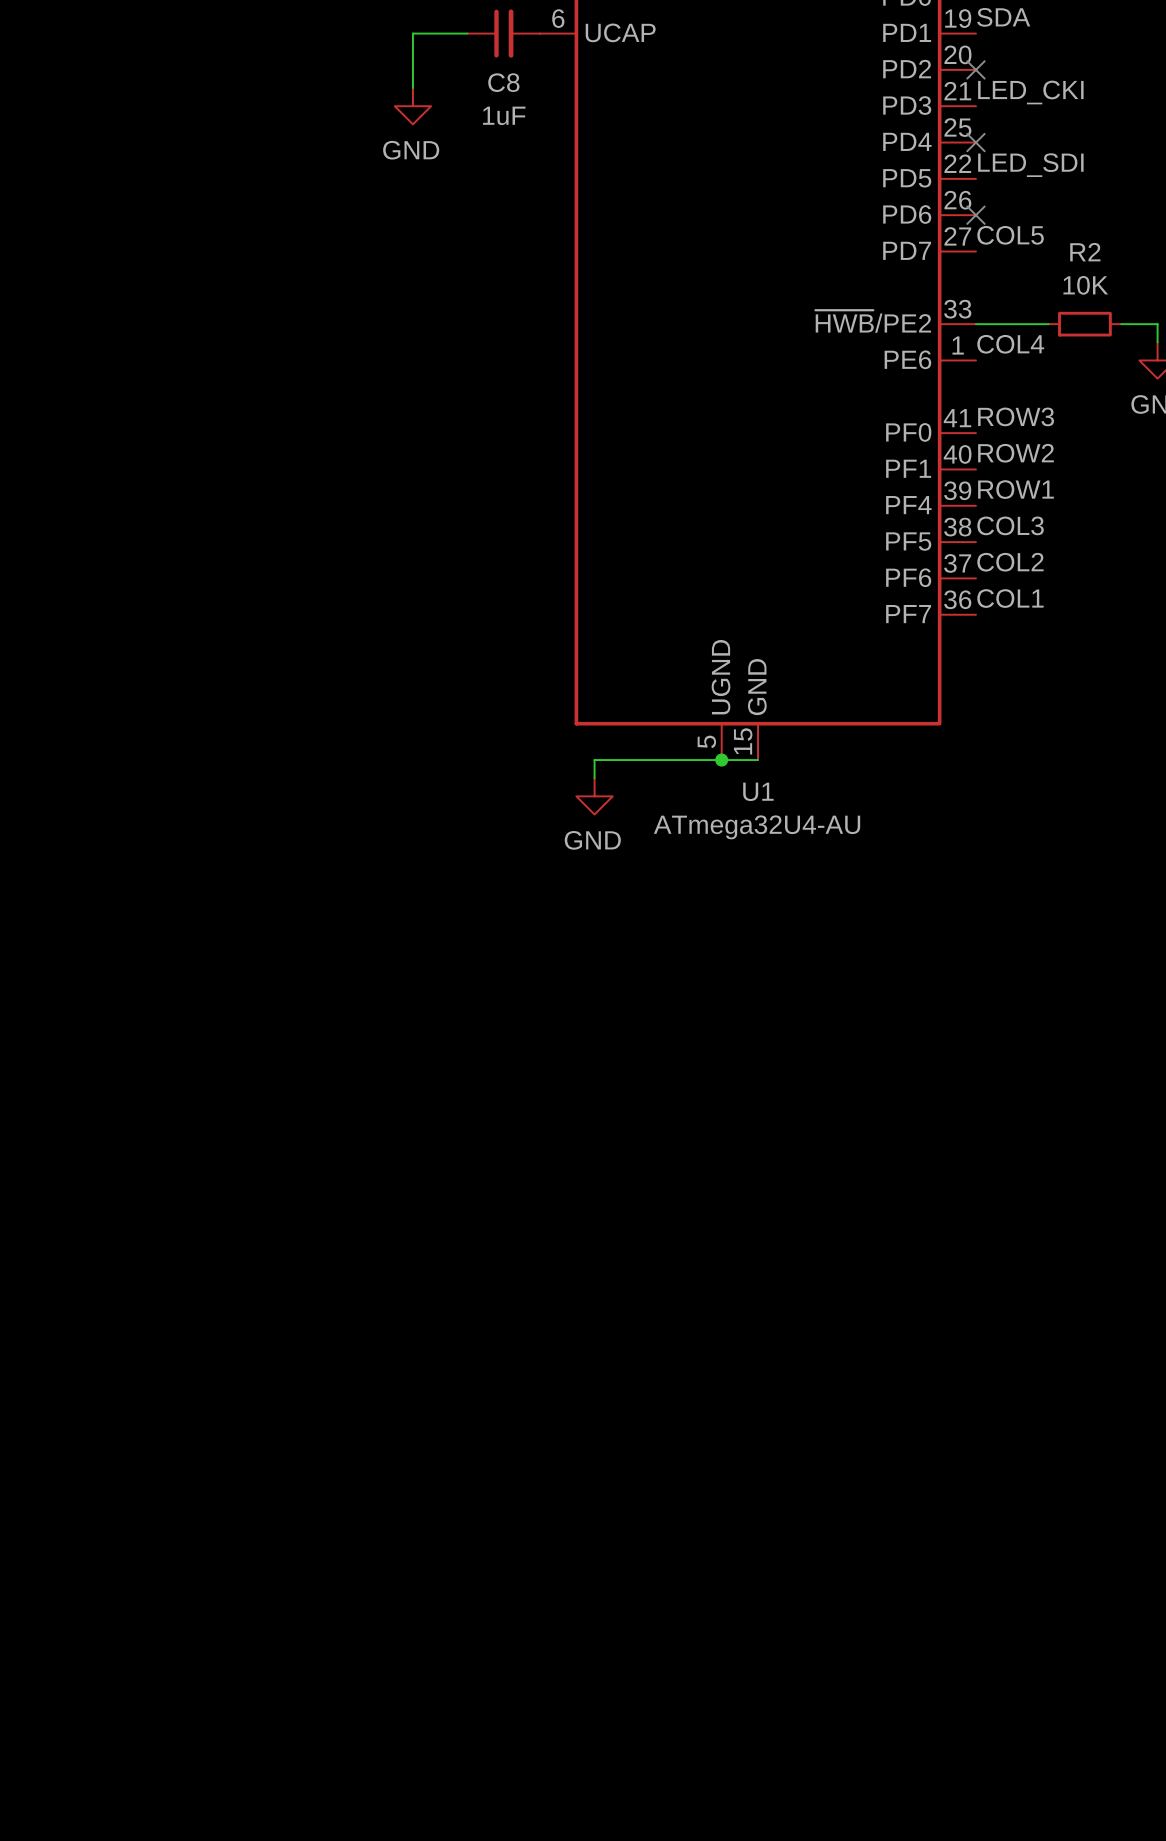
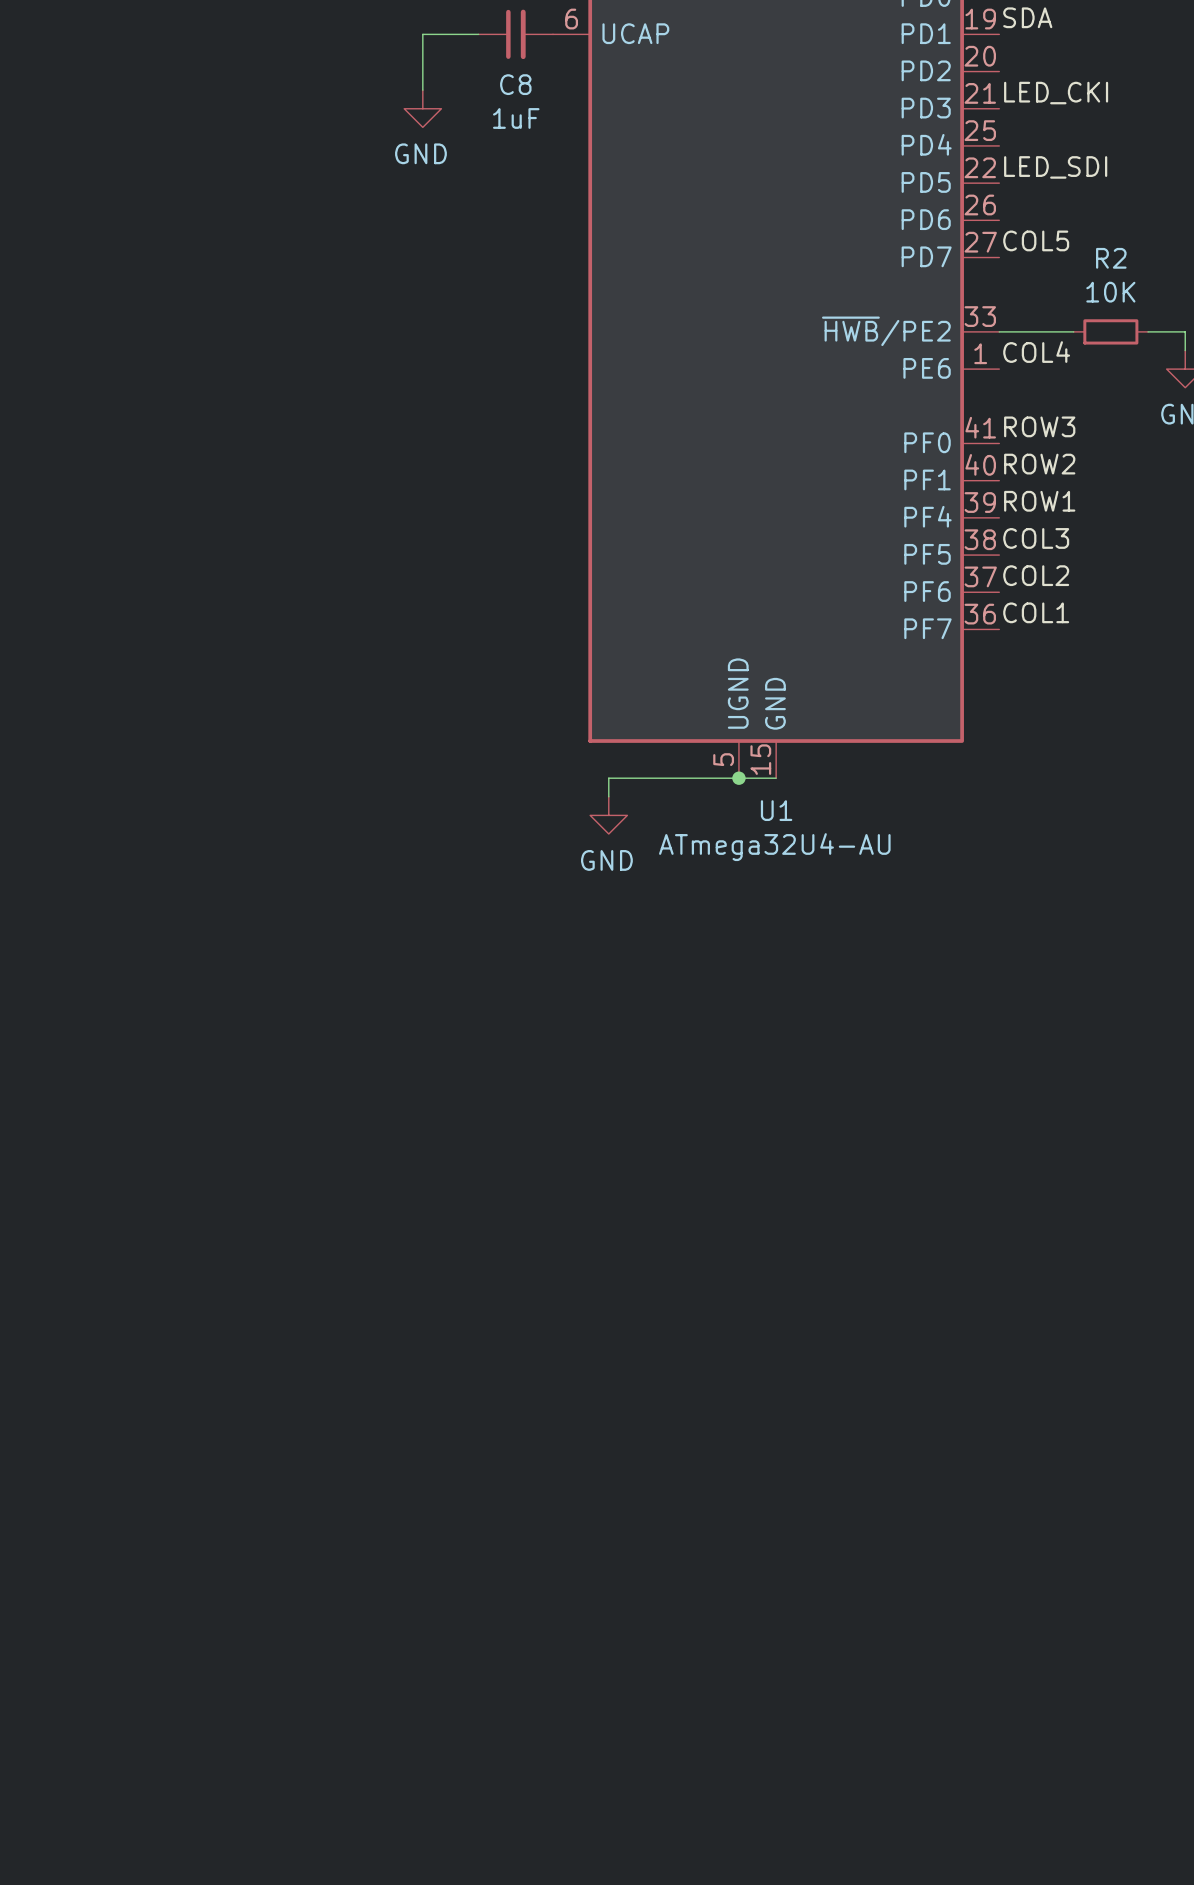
no-connect mark: (975, 69) -> none
no-connect mark: (975, 142) -> none
no-connect mark: (975, 215) -> none

